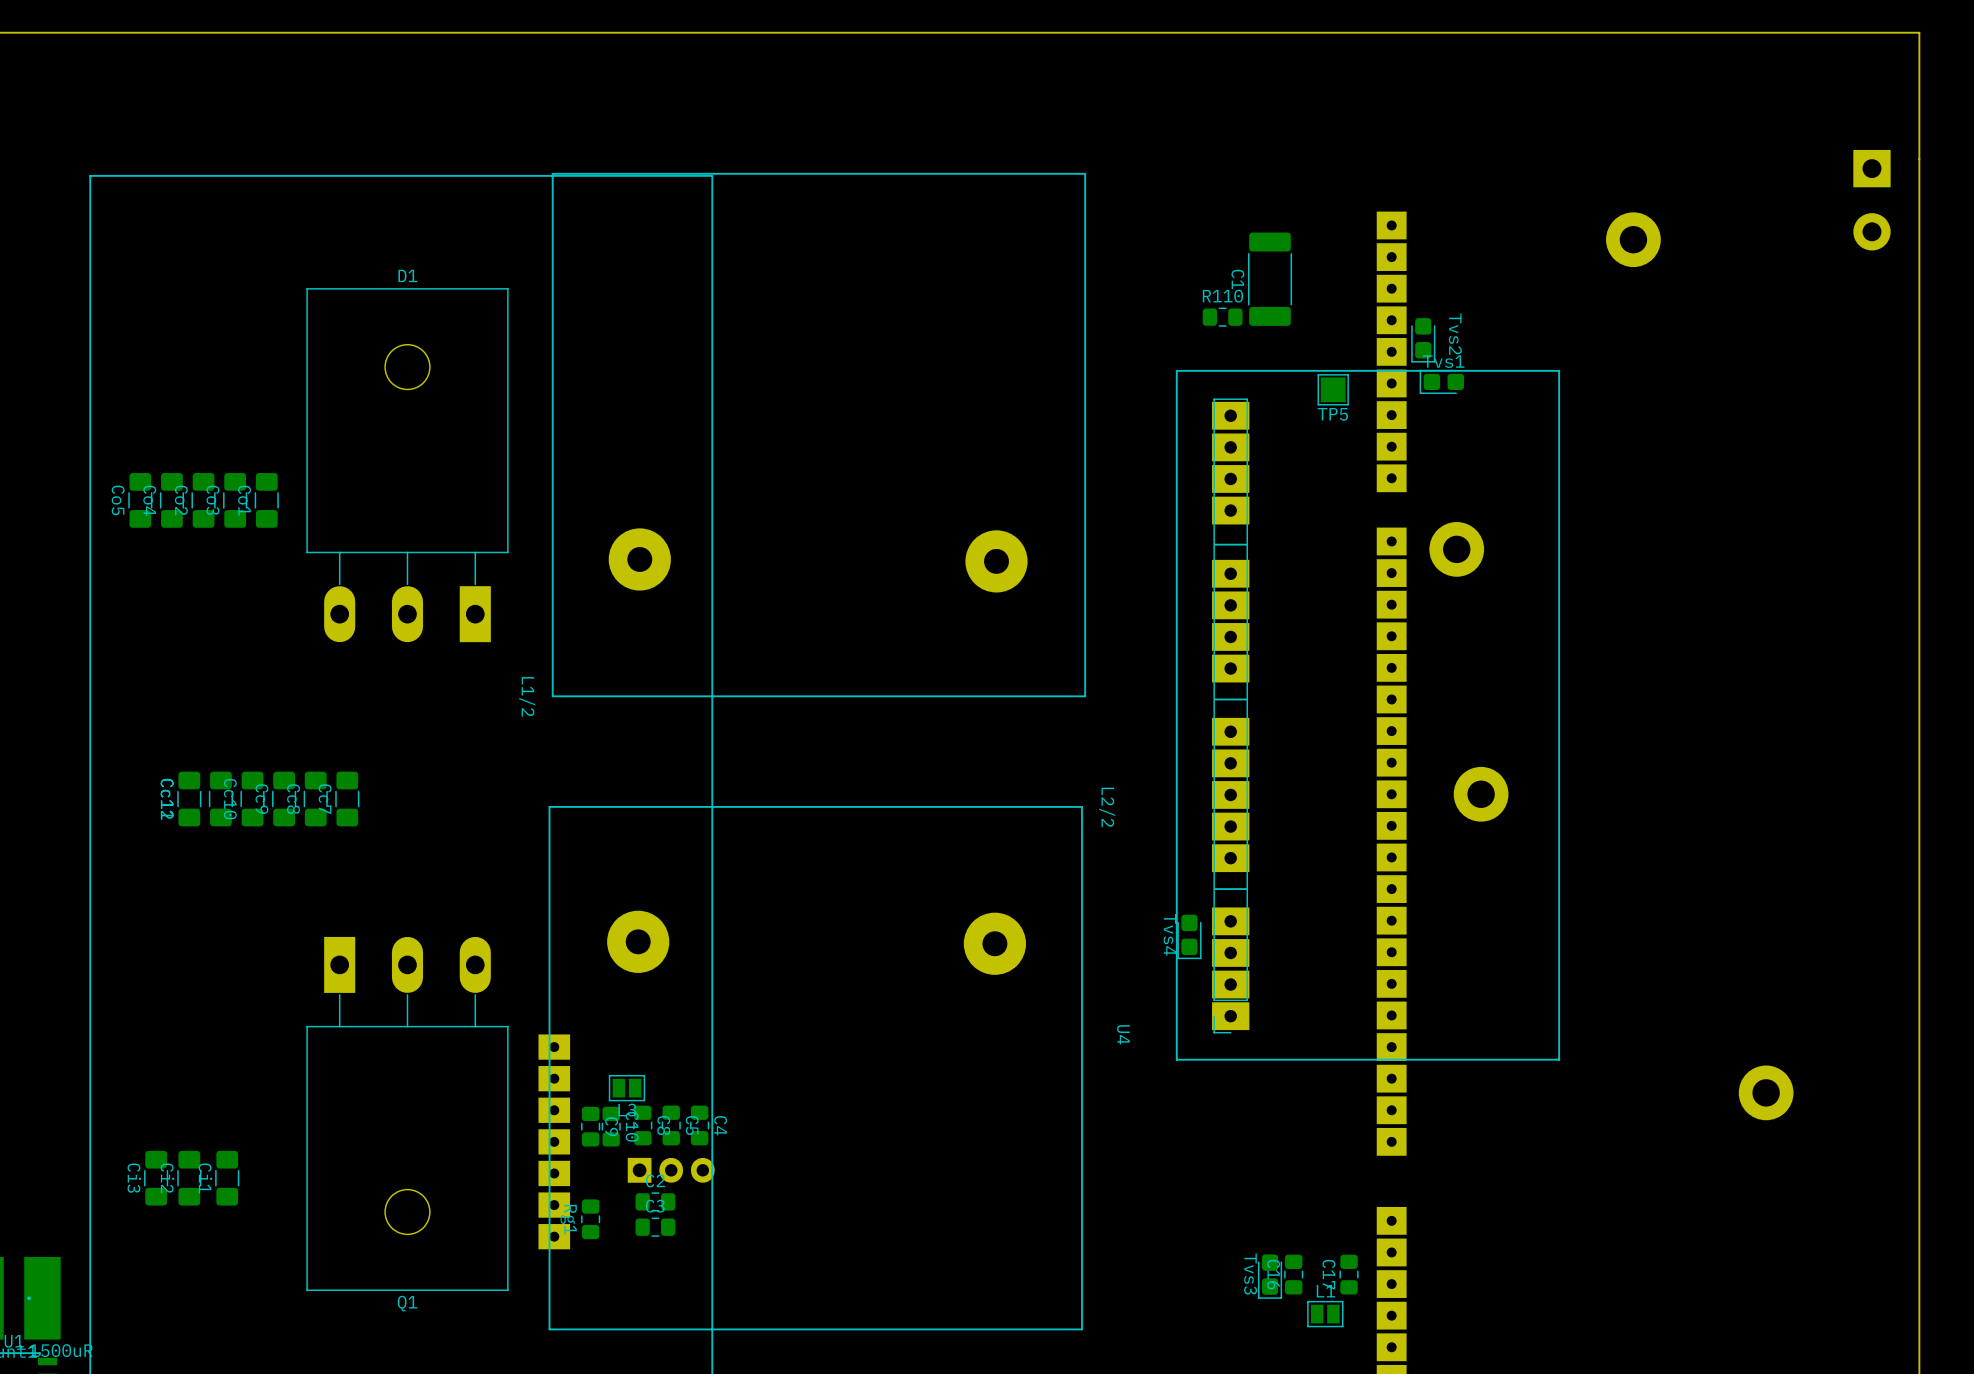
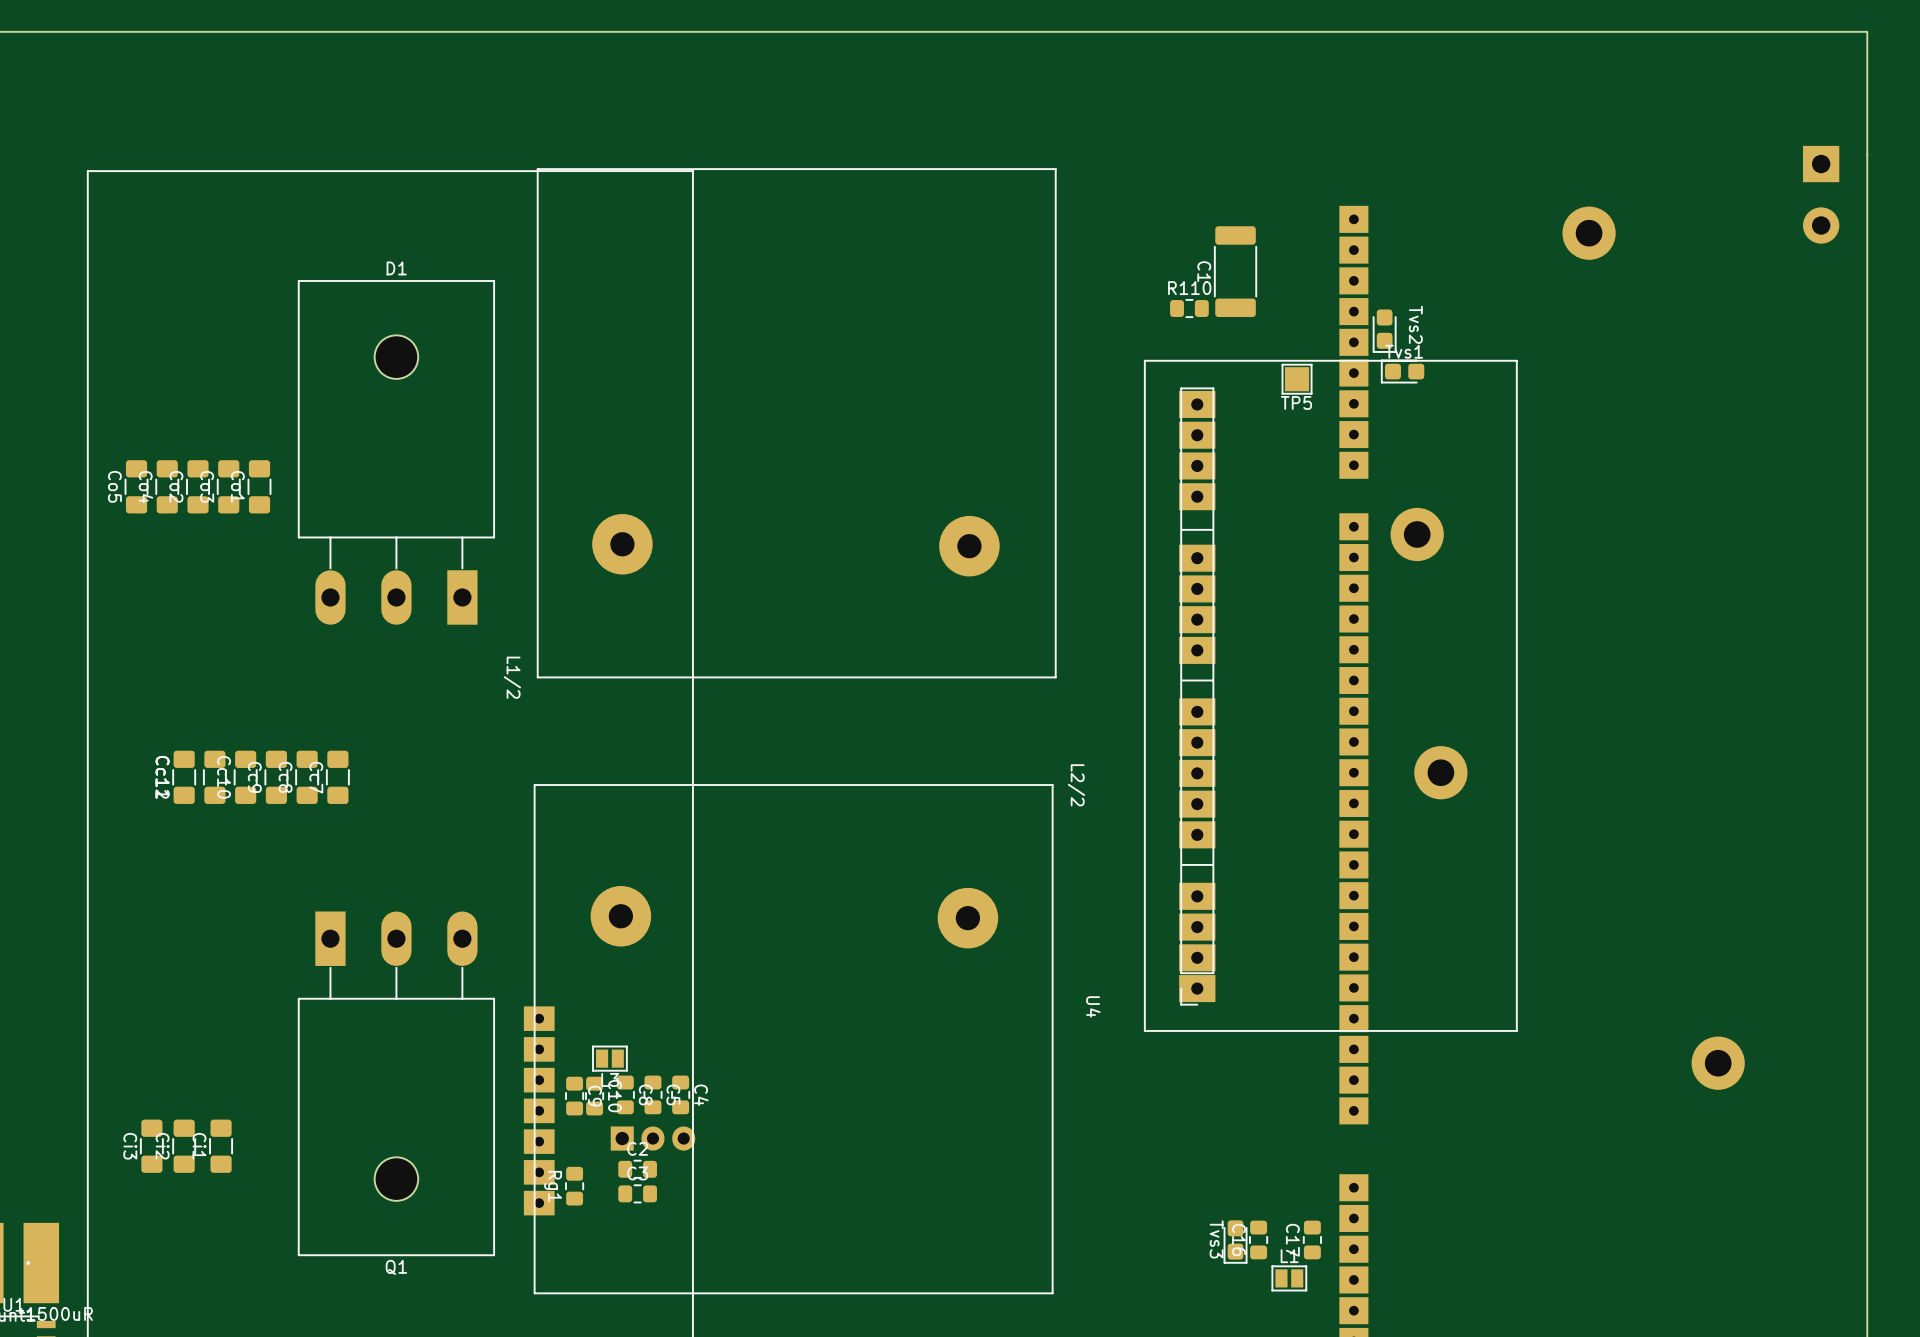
Tvs4: (1189, 936) -> none

